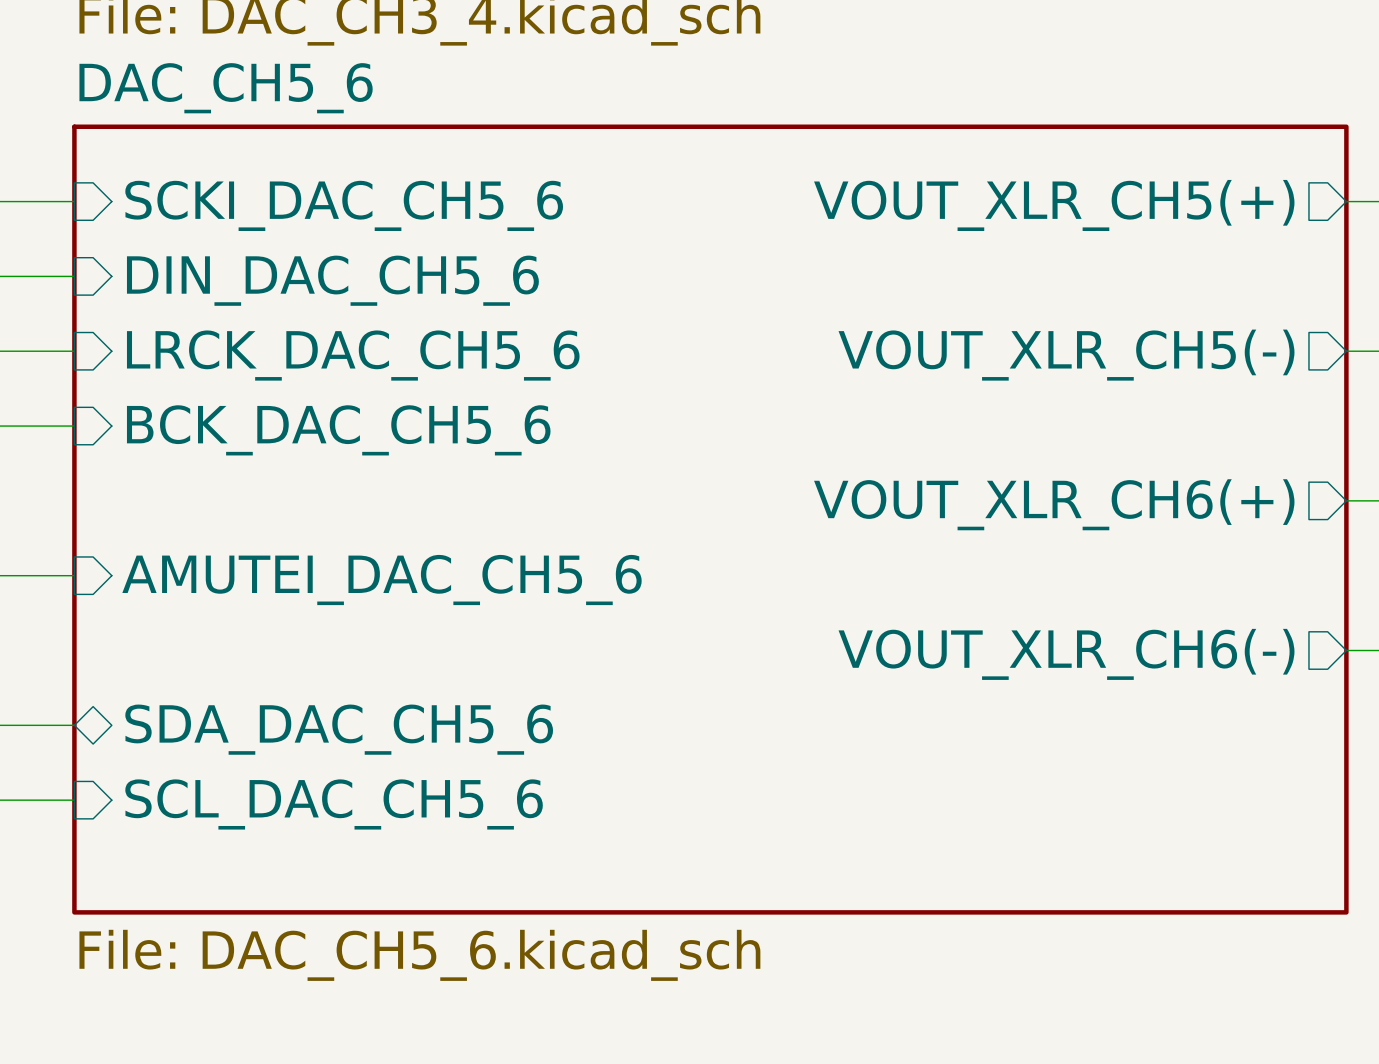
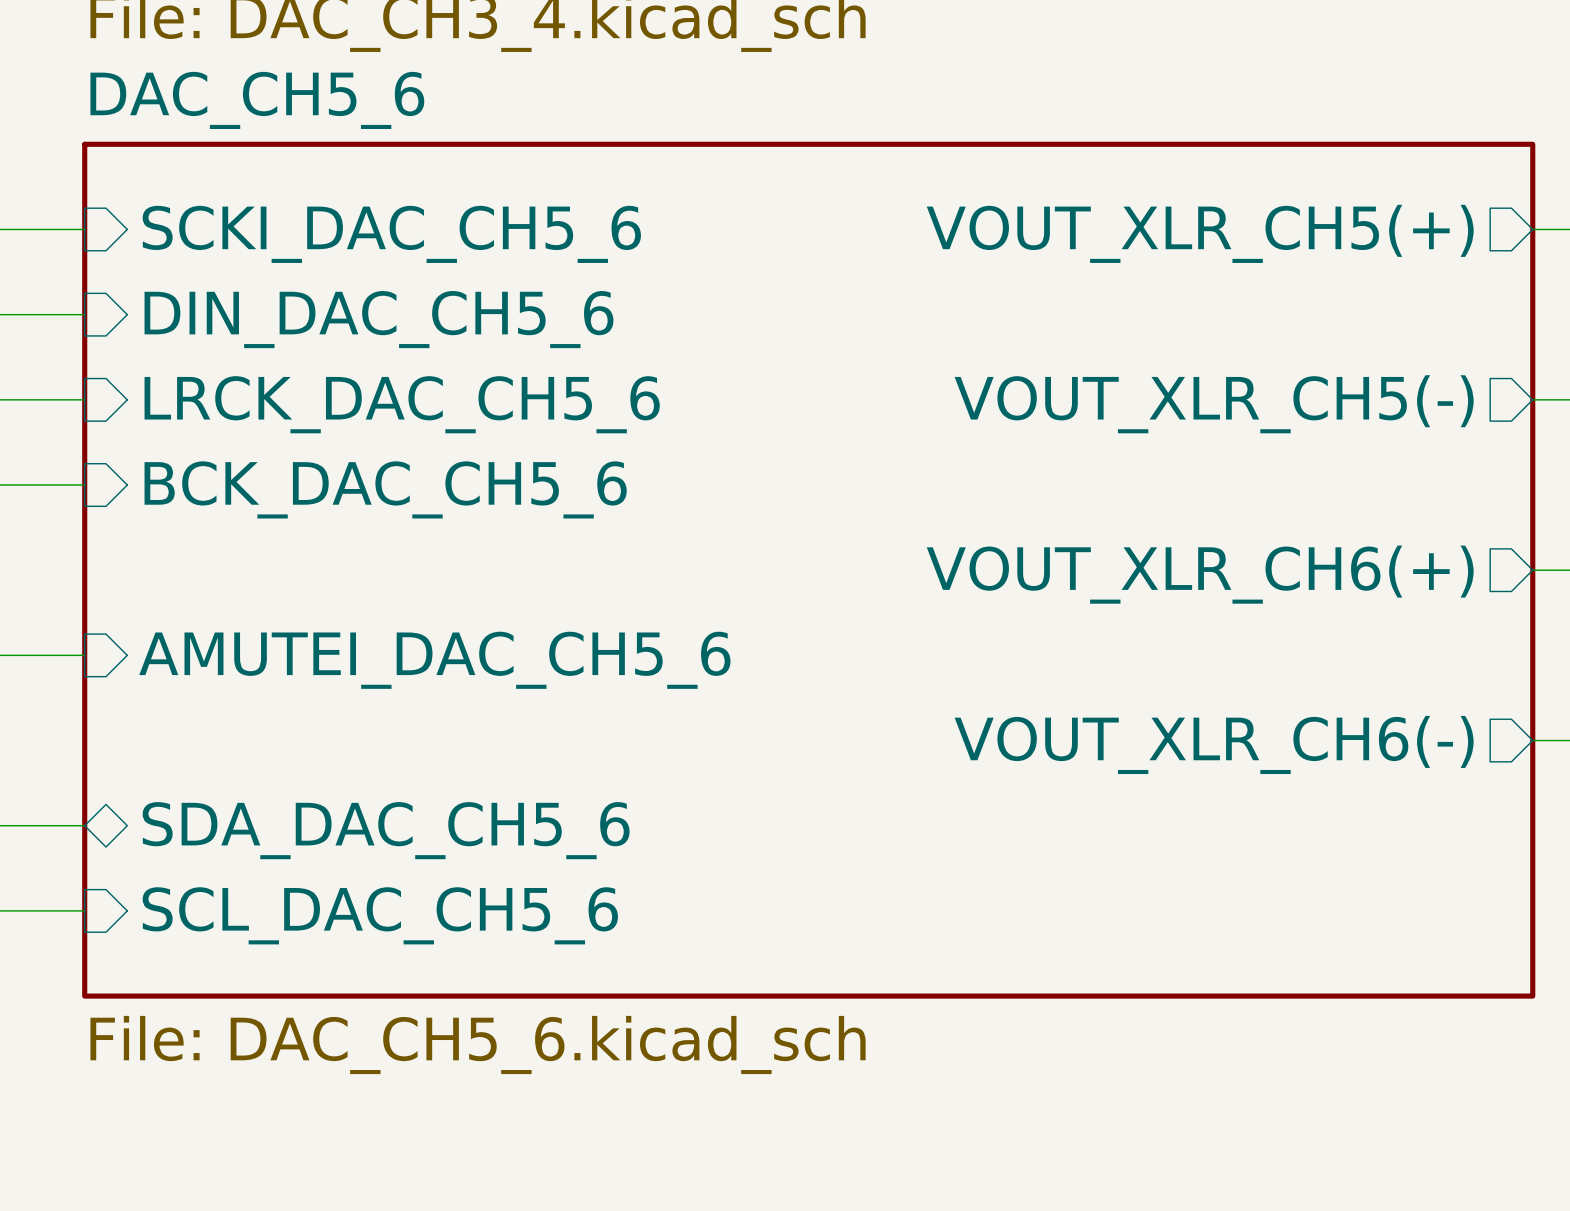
sheet DAC_CH5_6 shape: [72, 124, 1349, 915] -> [82, 141, 1536, 999]

